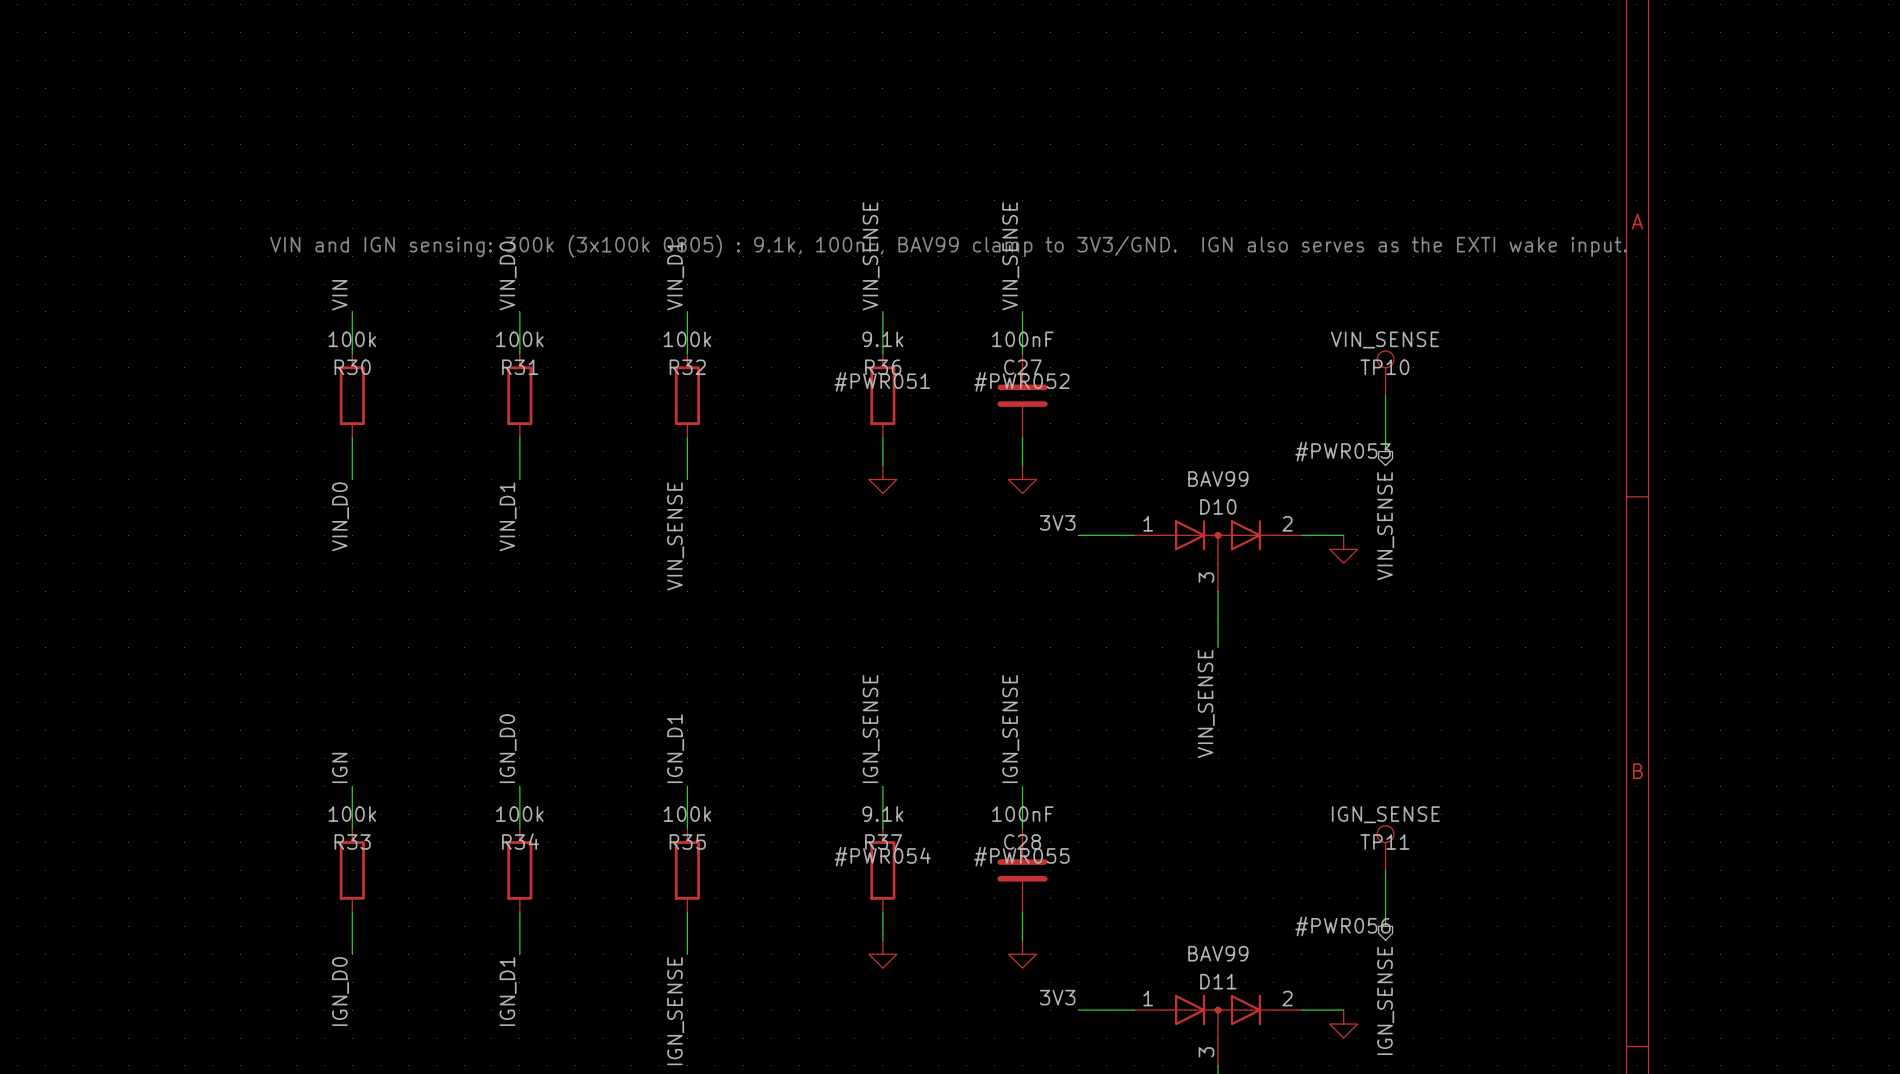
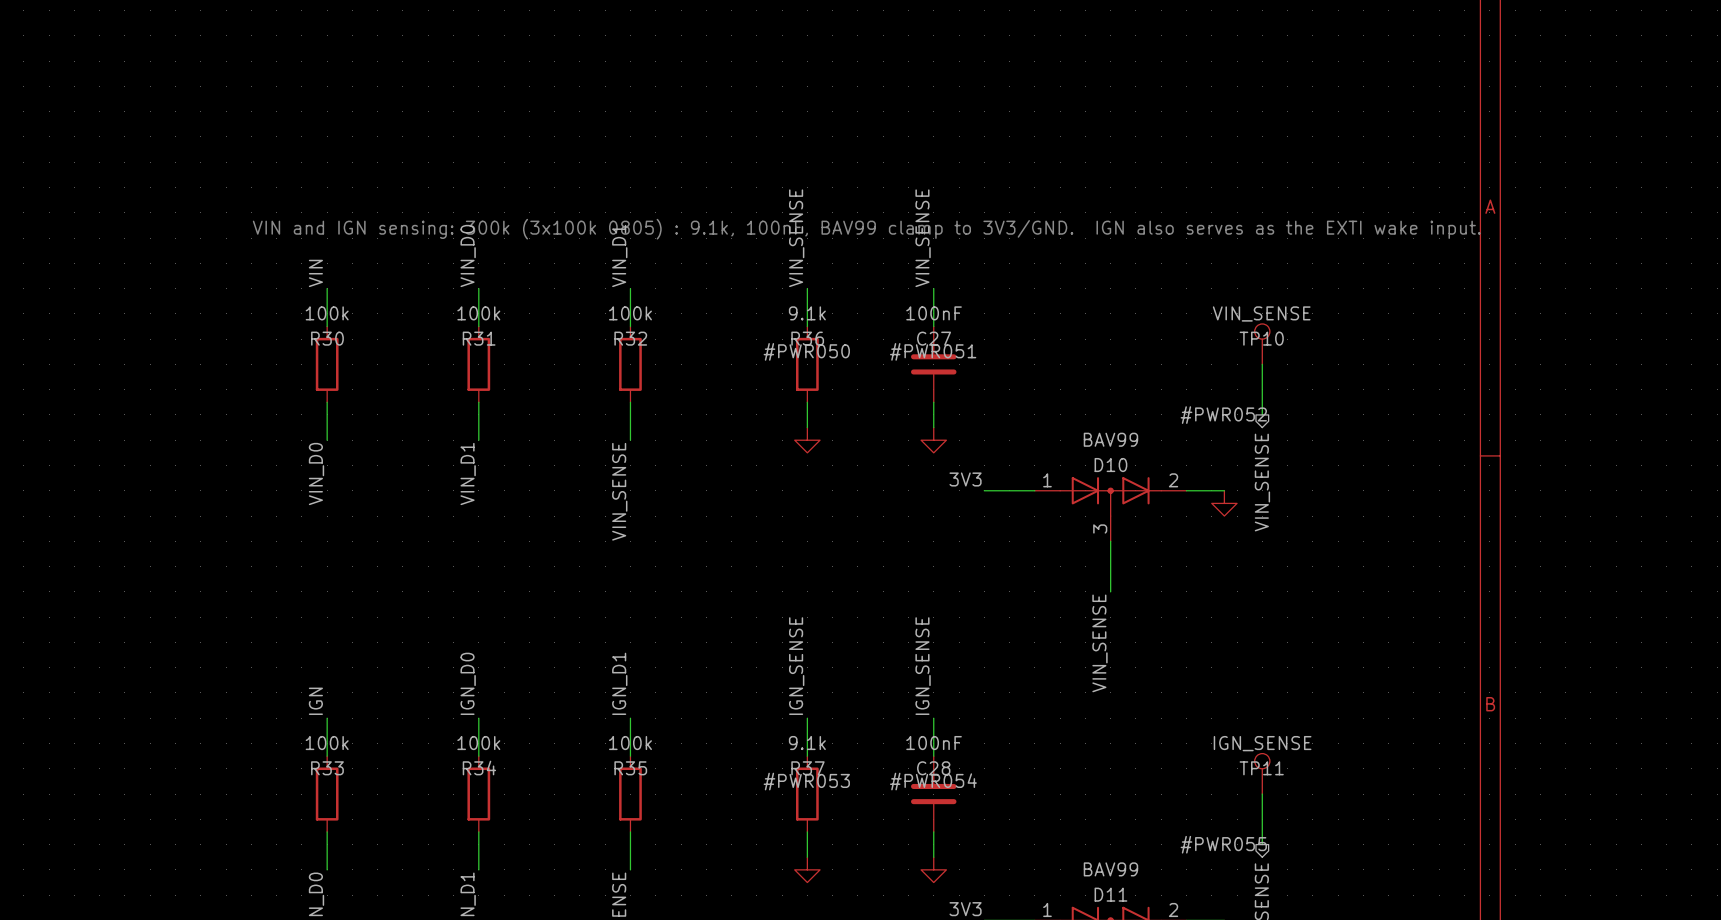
#PWR051 name: #PWR051 (882, 381) -> #PWR050 (806, 351)
#PWR052 name: #PWR052 (1021, 381) -> #PWR051 (933, 351)
#PWR053 name: #PWR053 (1343, 451) -> #PWR052 (1223, 415)
#PWR054 name: #PWR054 (882, 856) -> #PWR053 (806, 781)
#PWR055 name: #PWR055 (1021, 856) -> #PWR054 (933, 781)
#PWR056 name: #PWR056 (1343, 926) -> #PWR055 (1223, 844)

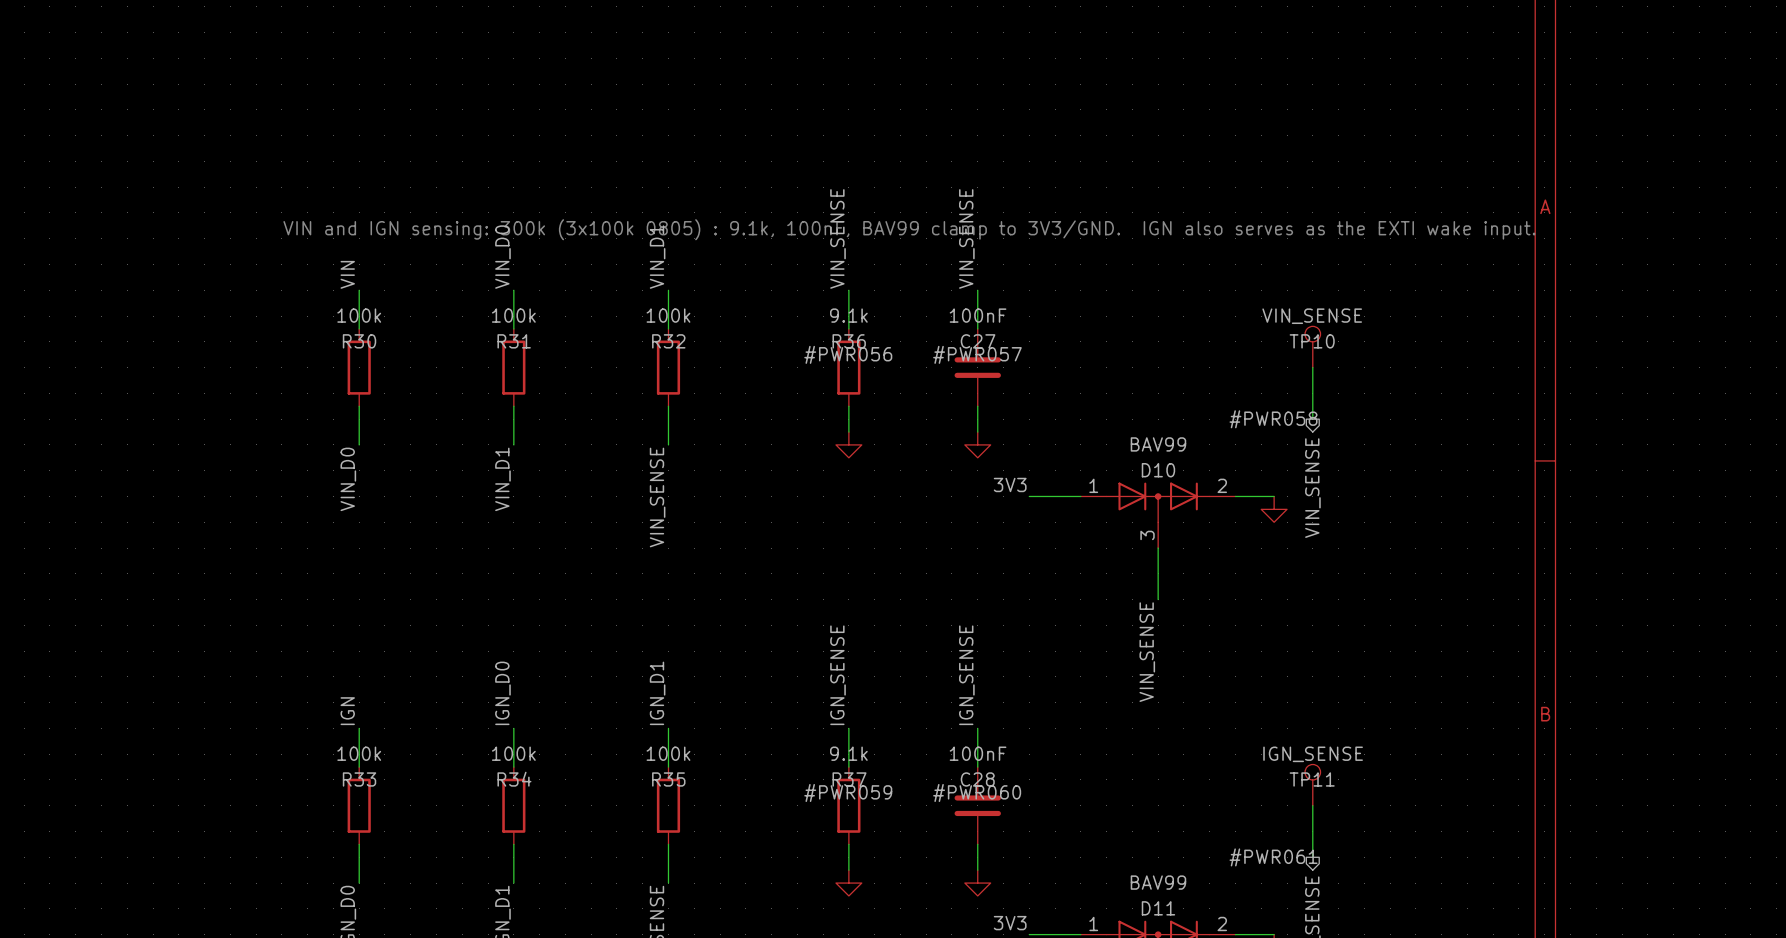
#PWR050 name: #PWR050 (806, 351) -> #PWR056 (848, 354)
#PWR051 name: #PWR051 (933, 351) -> #PWR057 (977, 354)
#PWR052 name: #PWR052 (1223, 415) -> #PWR058 (1273, 419)
#PWR053 name: #PWR053 (806, 781) -> #PWR059 (848, 792)
#PWR054 name: #PWR054 (933, 781) -> #PWR060 (977, 792)
#PWR055 name: #PWR055 (1223, 844) -> #PWR061 (1273, 857)

